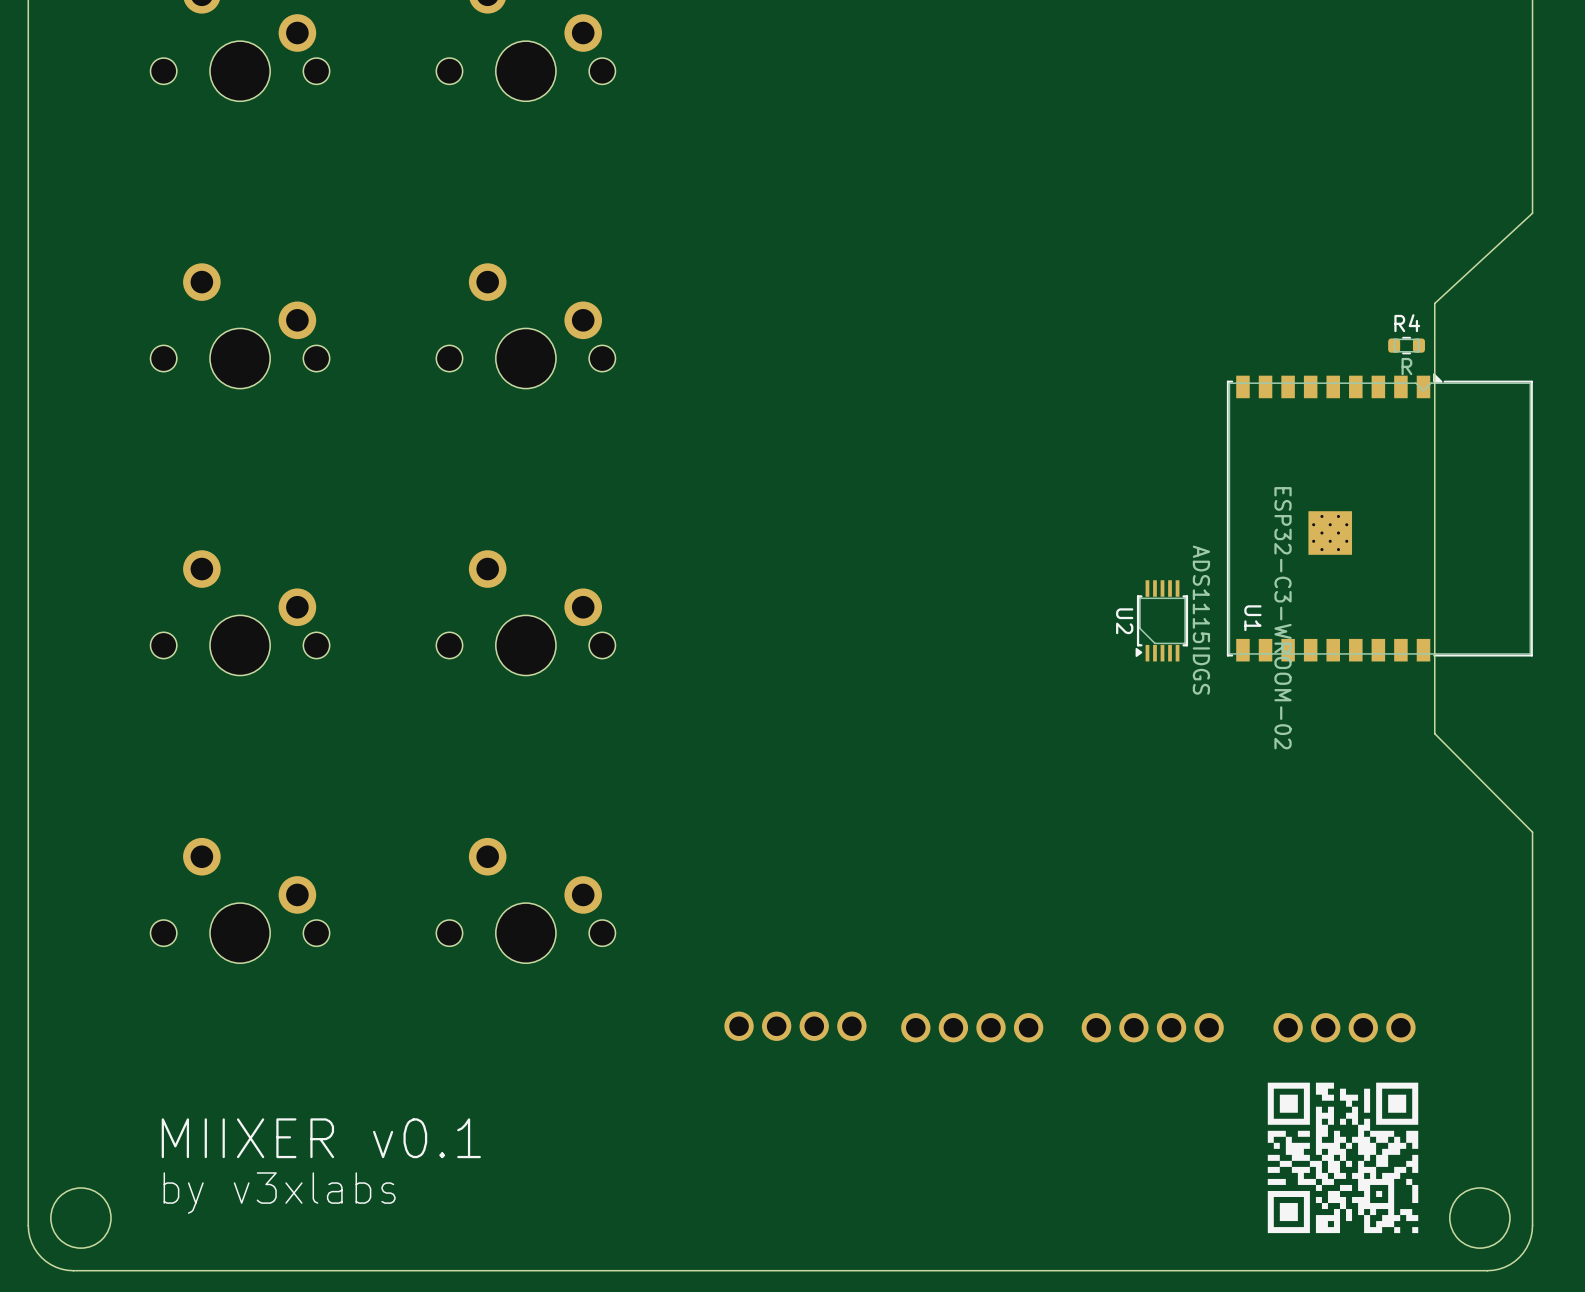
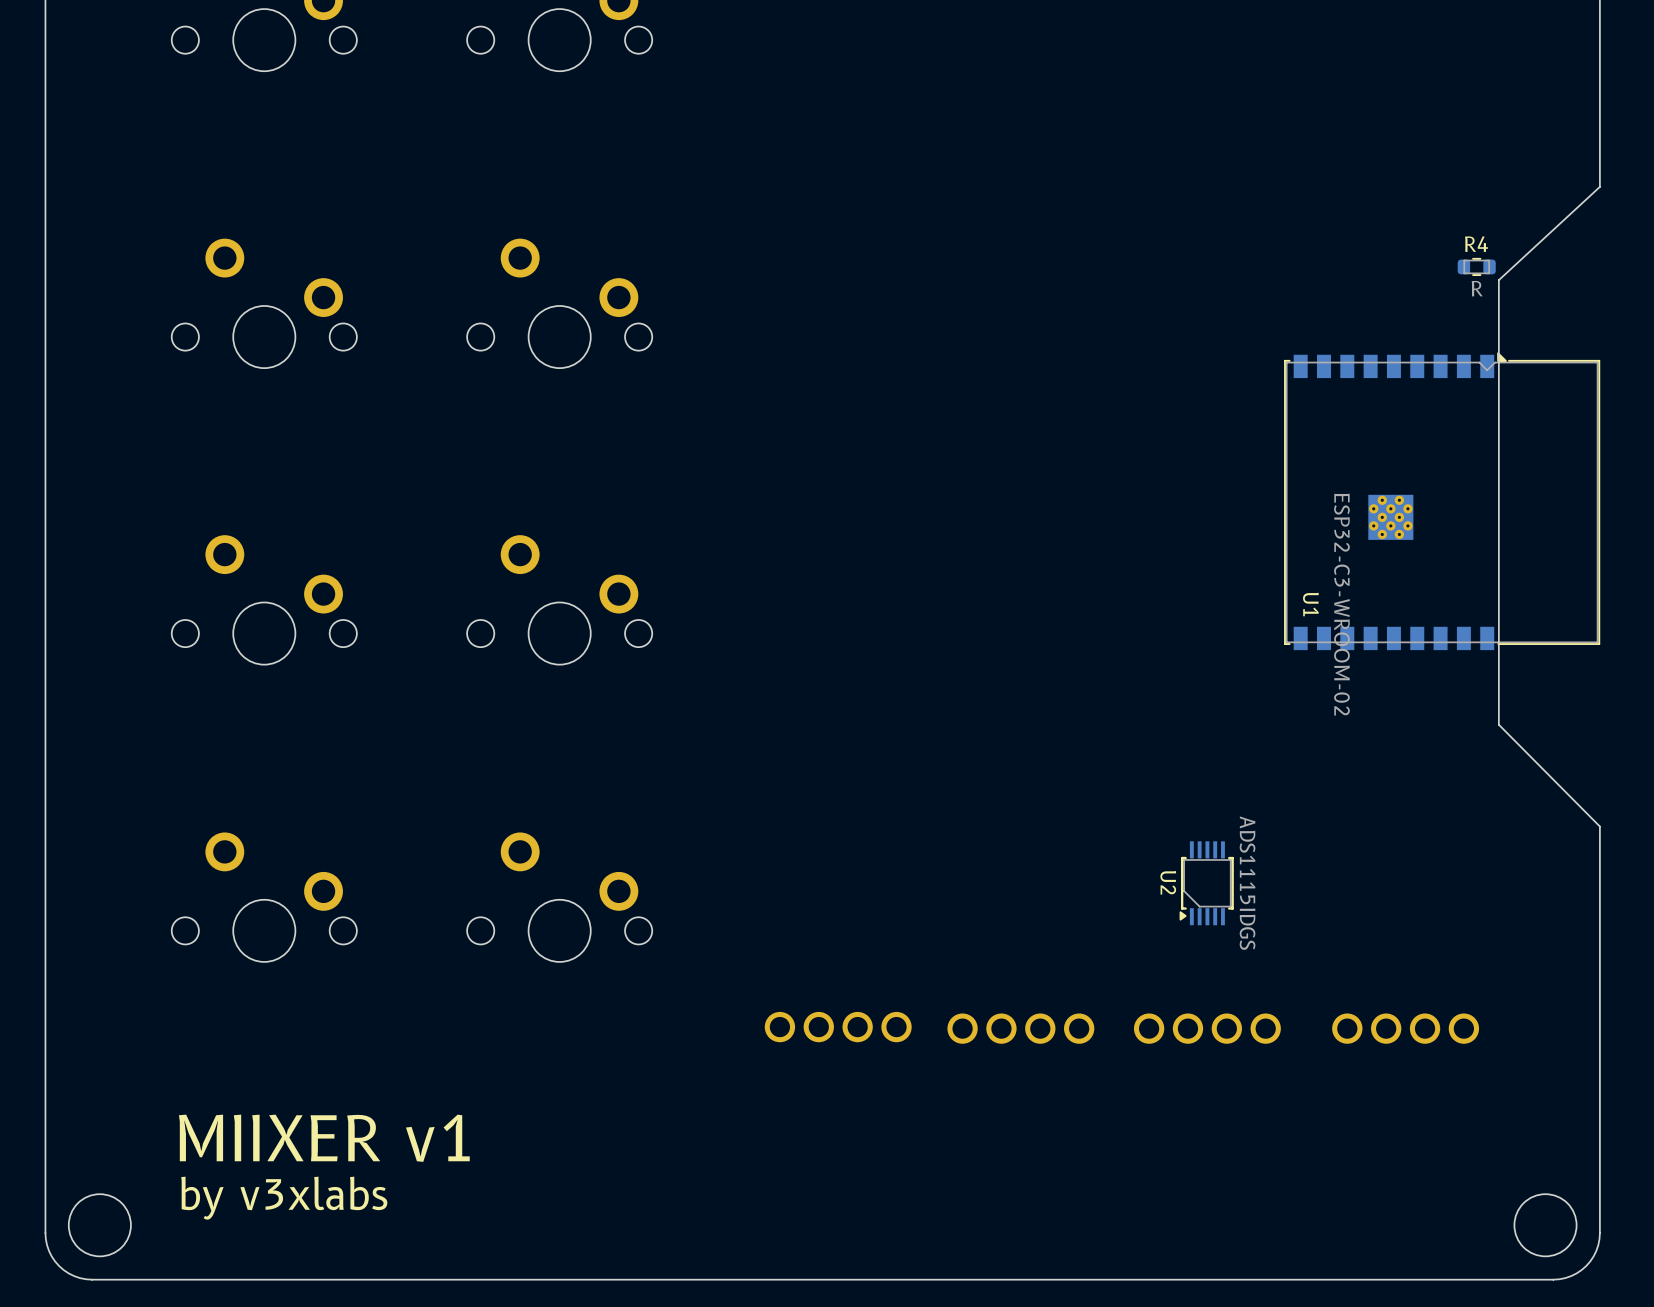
R4 position: (1406, 345) -> (1476, 266)
U2 position: (1161, 620) -> (1206, 883)
drawing: [1267, 1082, 1419, 1234] -> none
text: MIIXER v0.1 (321, 1138) -> MIIXER v1 (324, 1138)

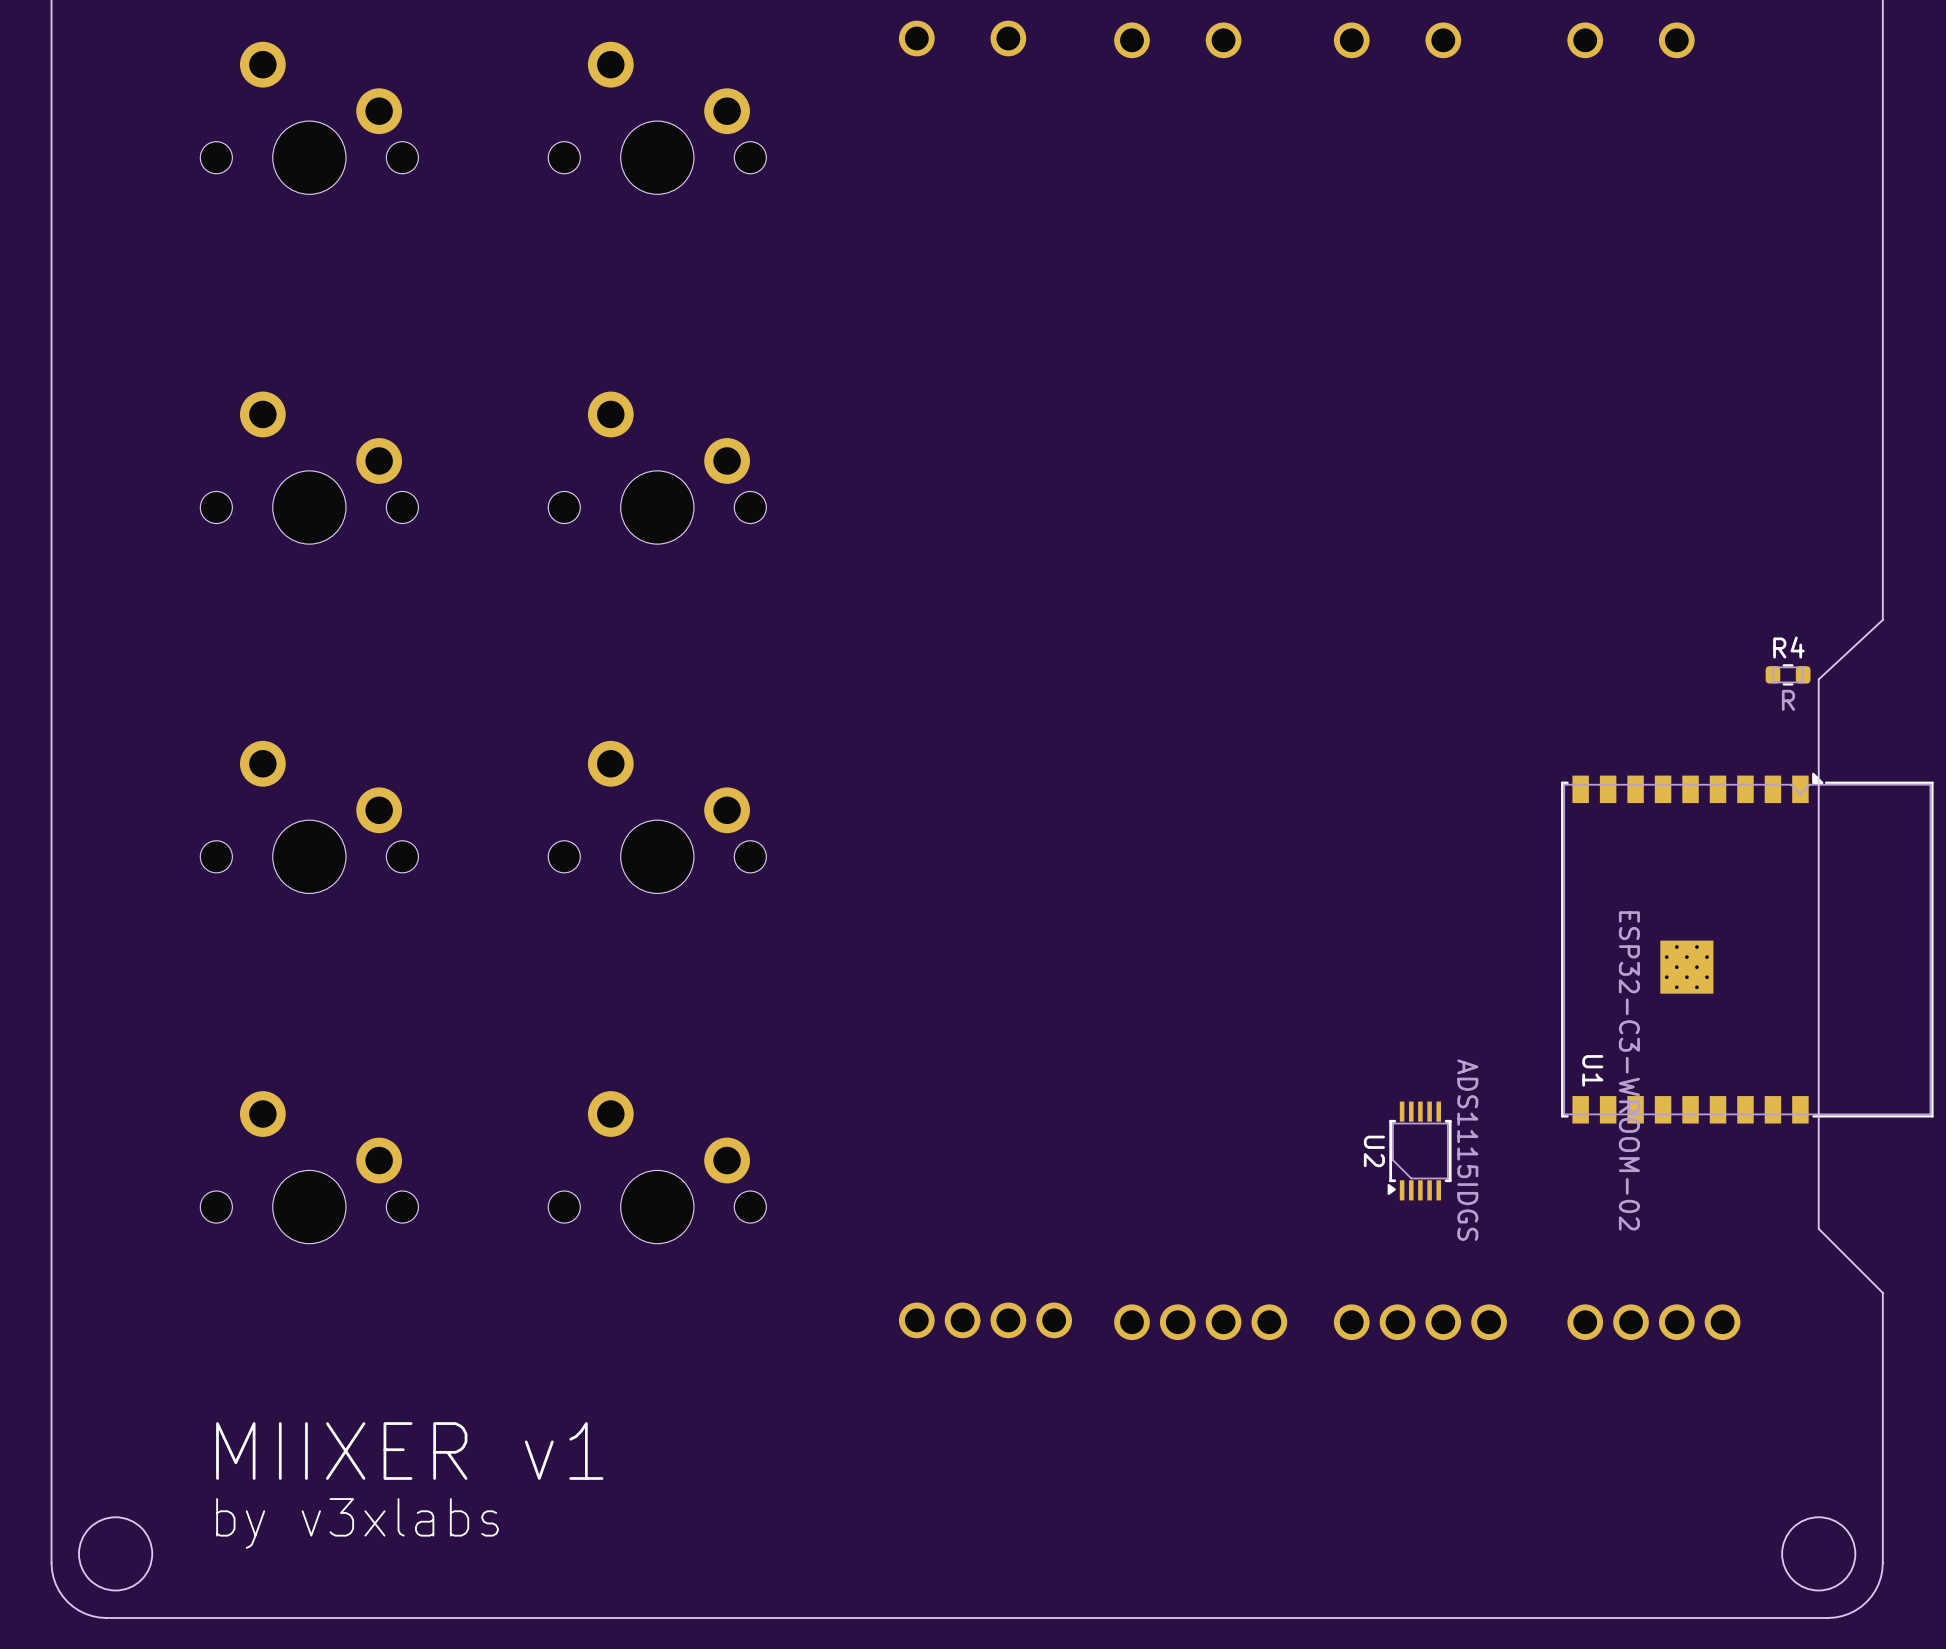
board edge: (1599, 186) (1498, 280) (1498, 724) (1599, 826) (1599, 1003) -> (1882, 330) (1882, 619) (1818, 679) (1818, 1228) (1882, 1292)
R4 position: (1476, 266) -> (1788, 674)
U1 position: (1442, 501) -> (1747, 948)

